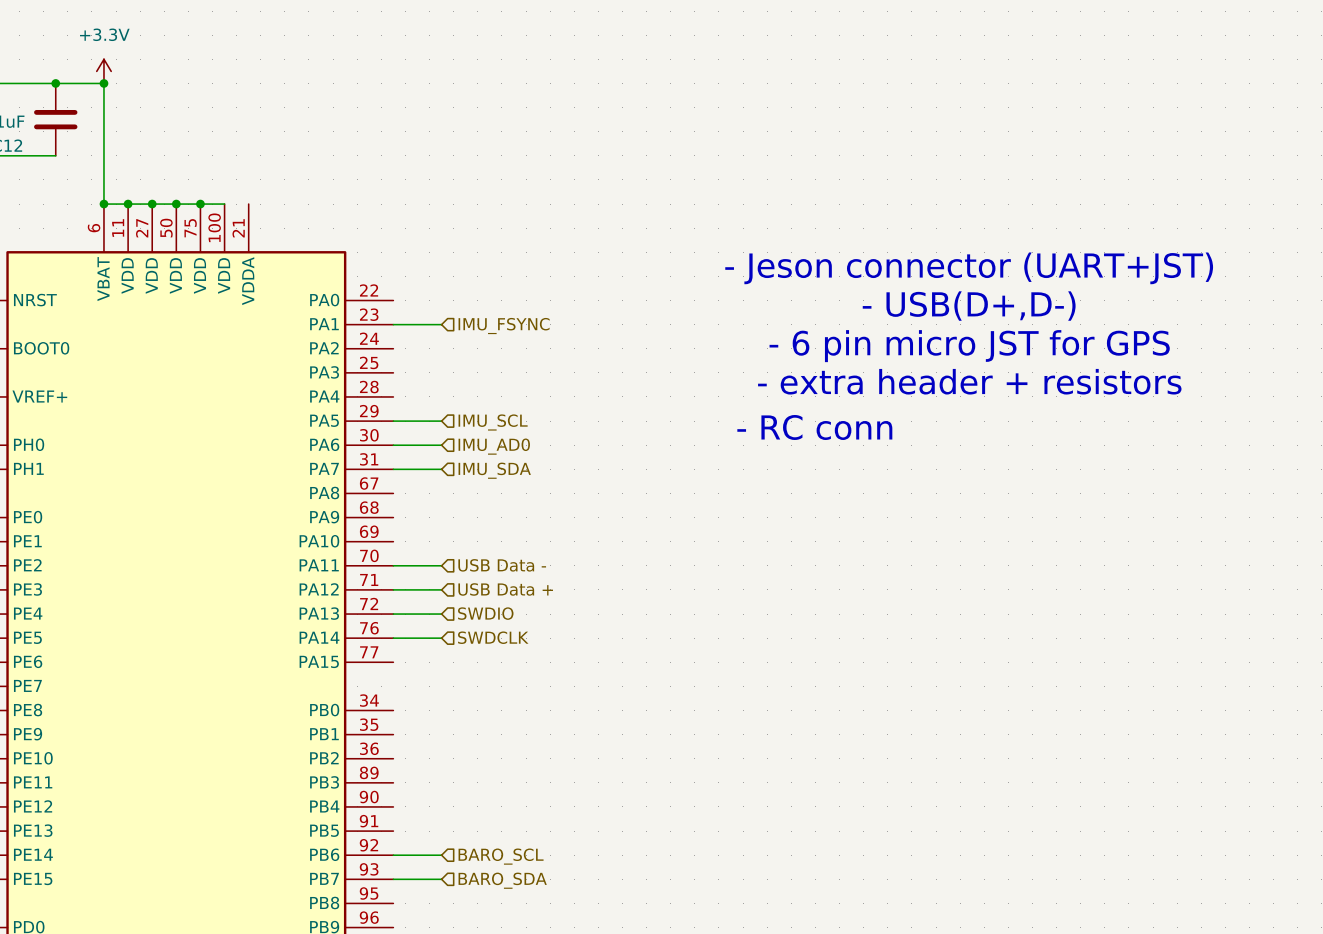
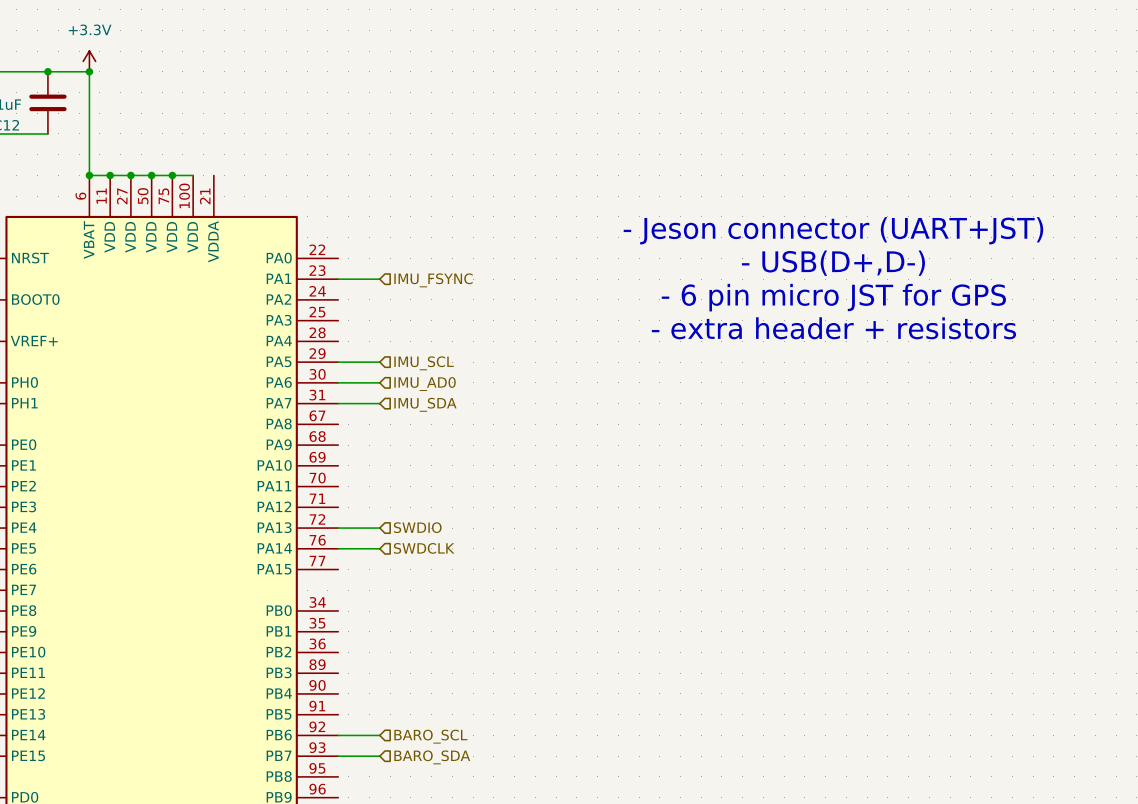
text: - RC conn (814, 427) -> none
wire: (393, 565) (441, 565) -> none
hierarchical label: USB Data - (502, 565) -> none
wire: (393, 589) (441, 589) -> none
hierarchical label: USB Data + (505, 589) -> none

